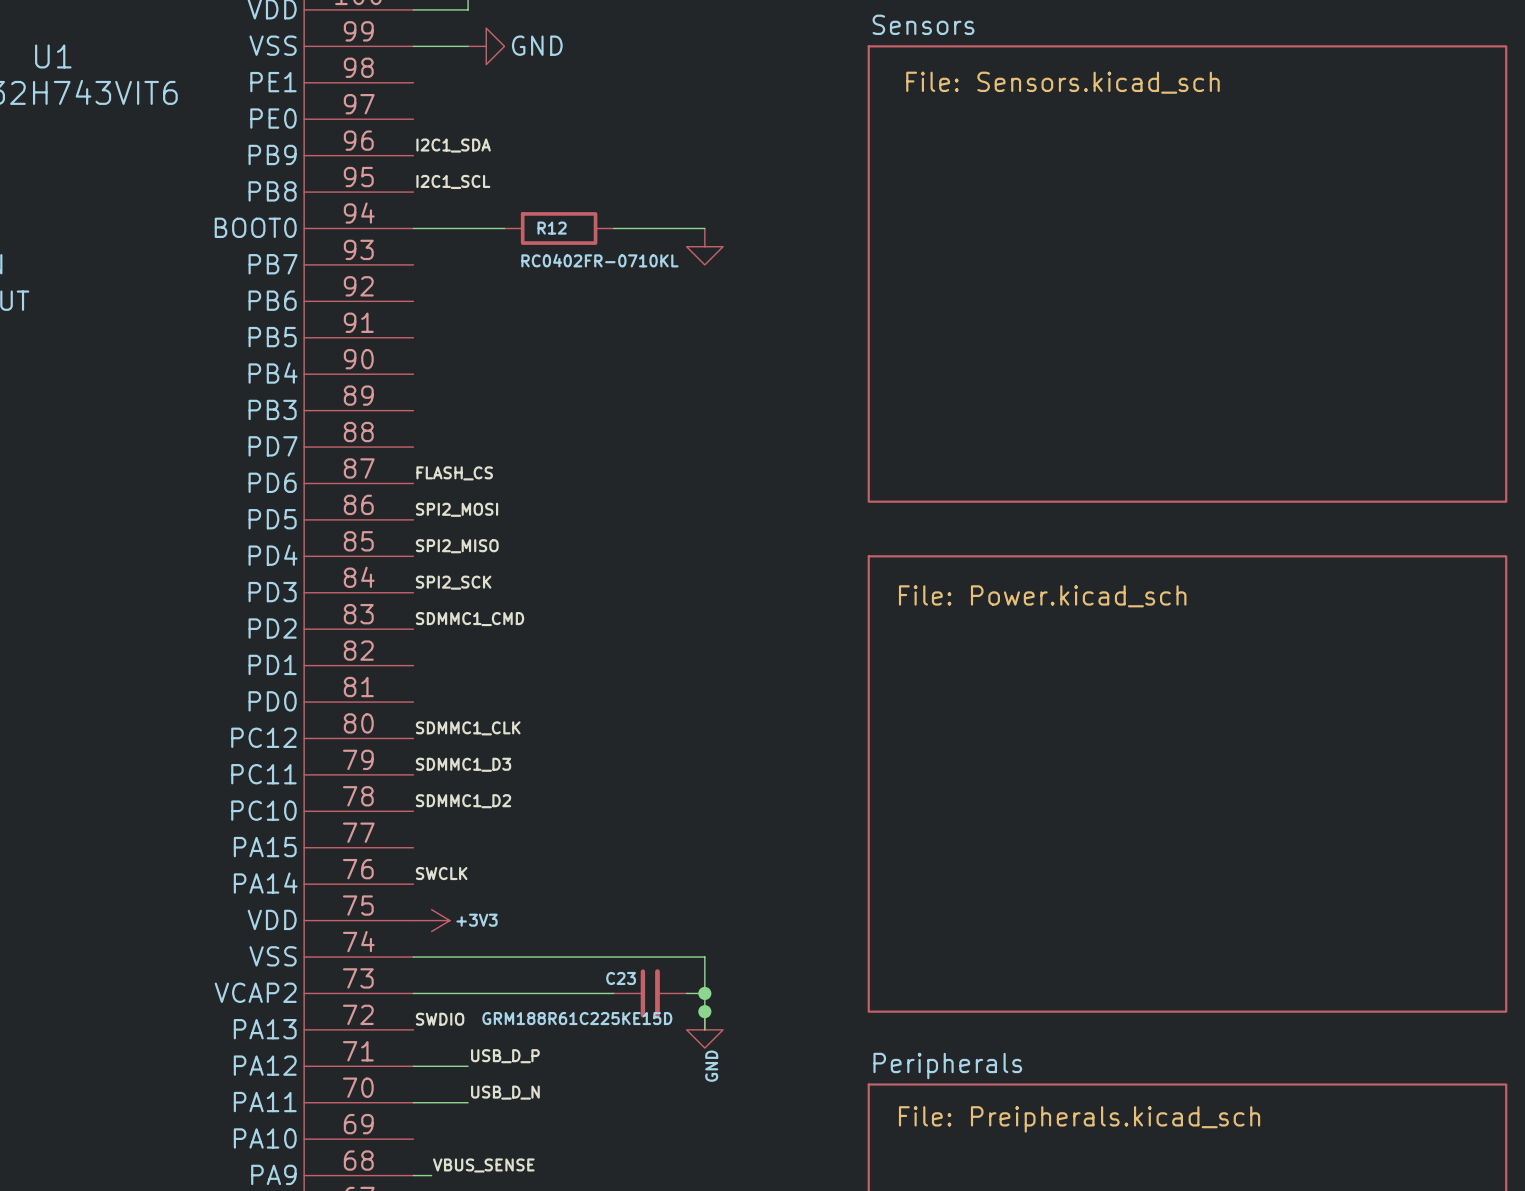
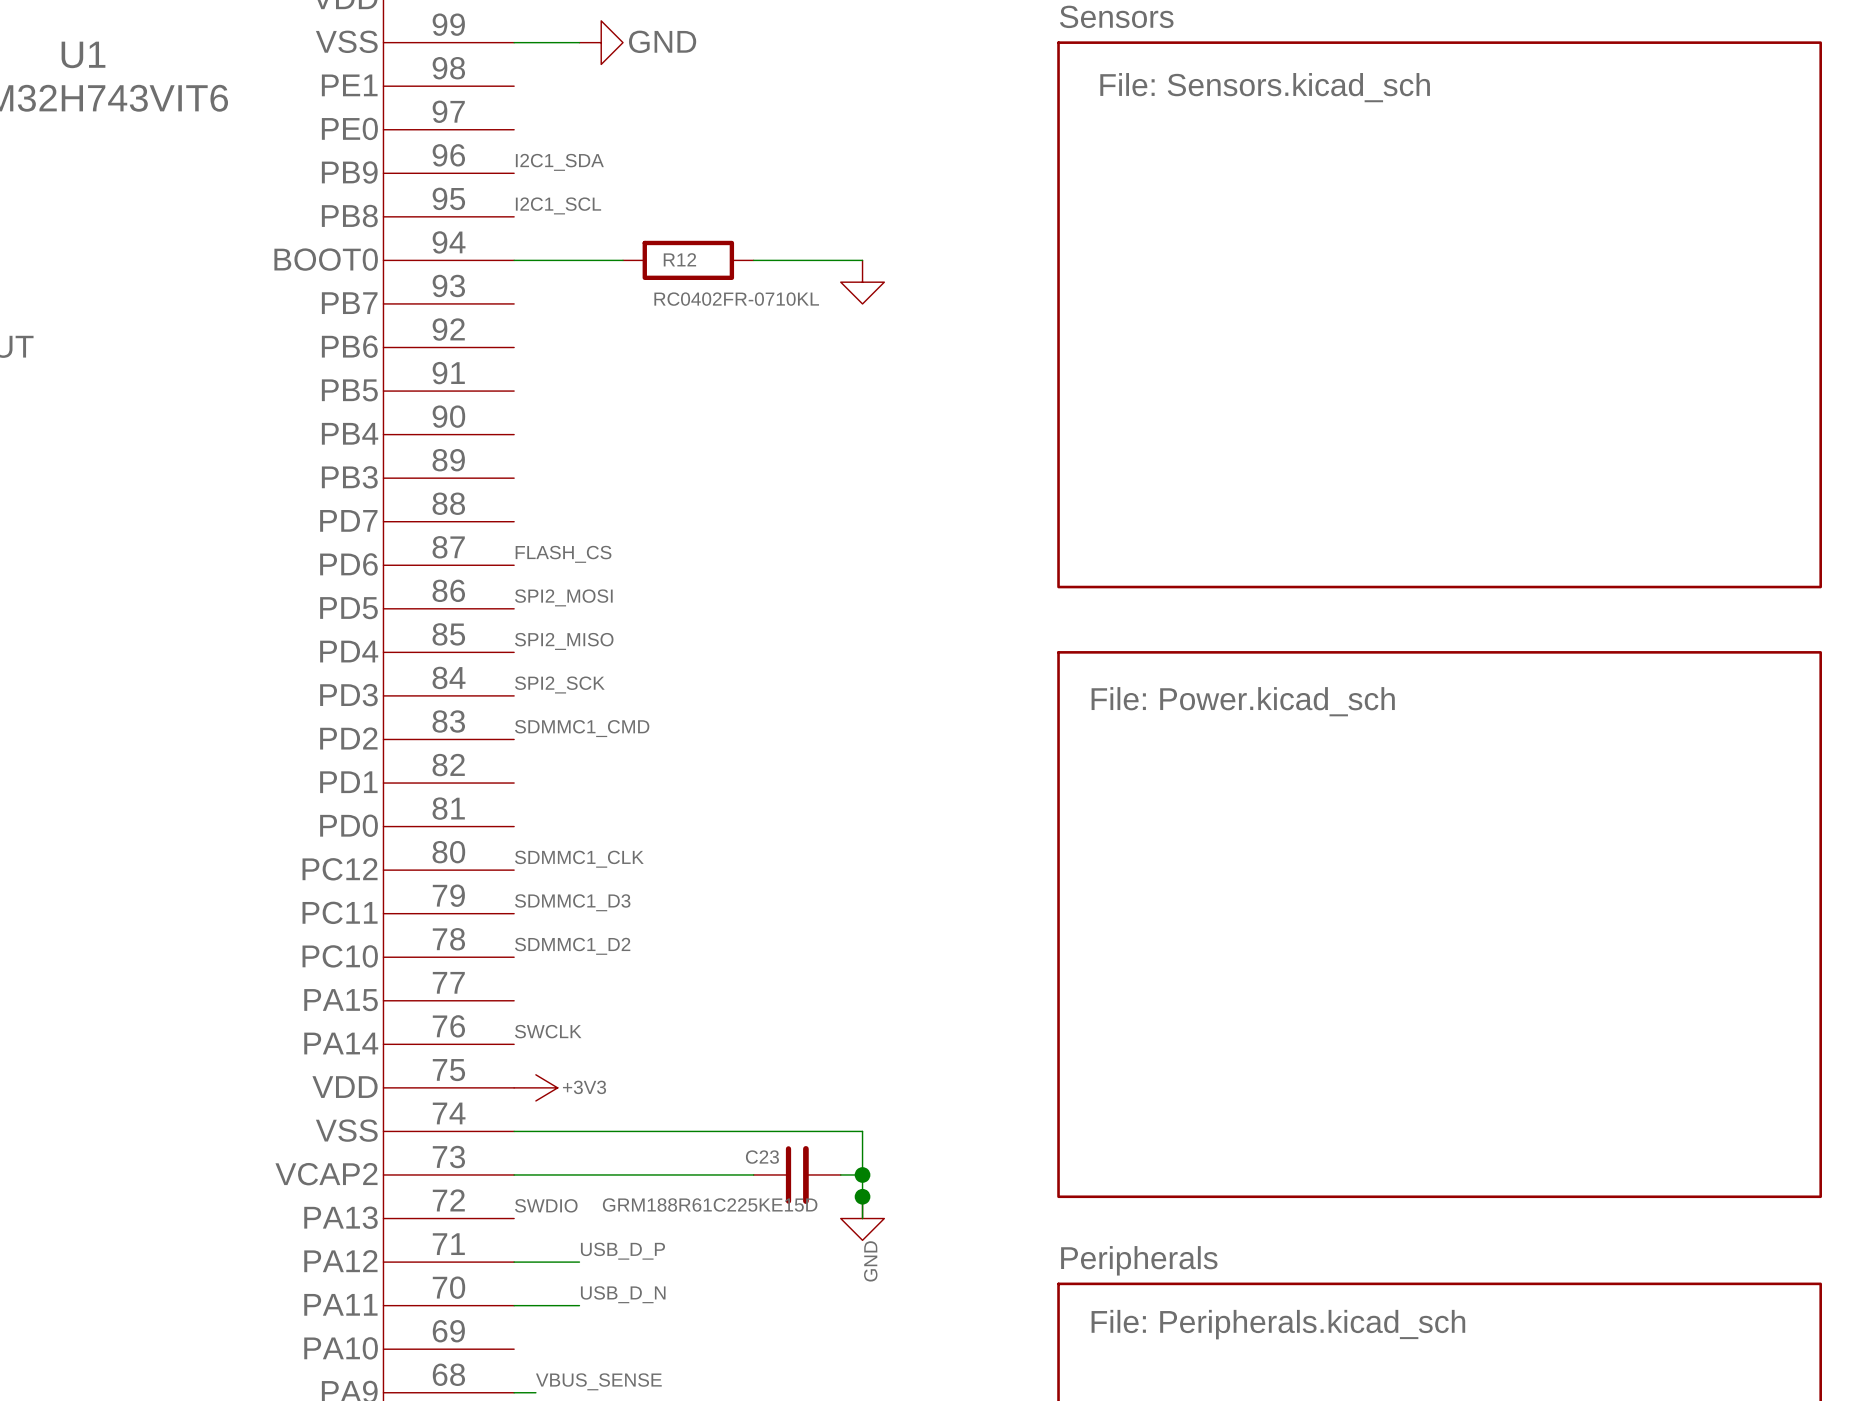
sheet Peripherals value: File: Preipherals.kicad_sch (1079, 1119) -> File: Peripherals.kicad_sch (1278, 1324)

